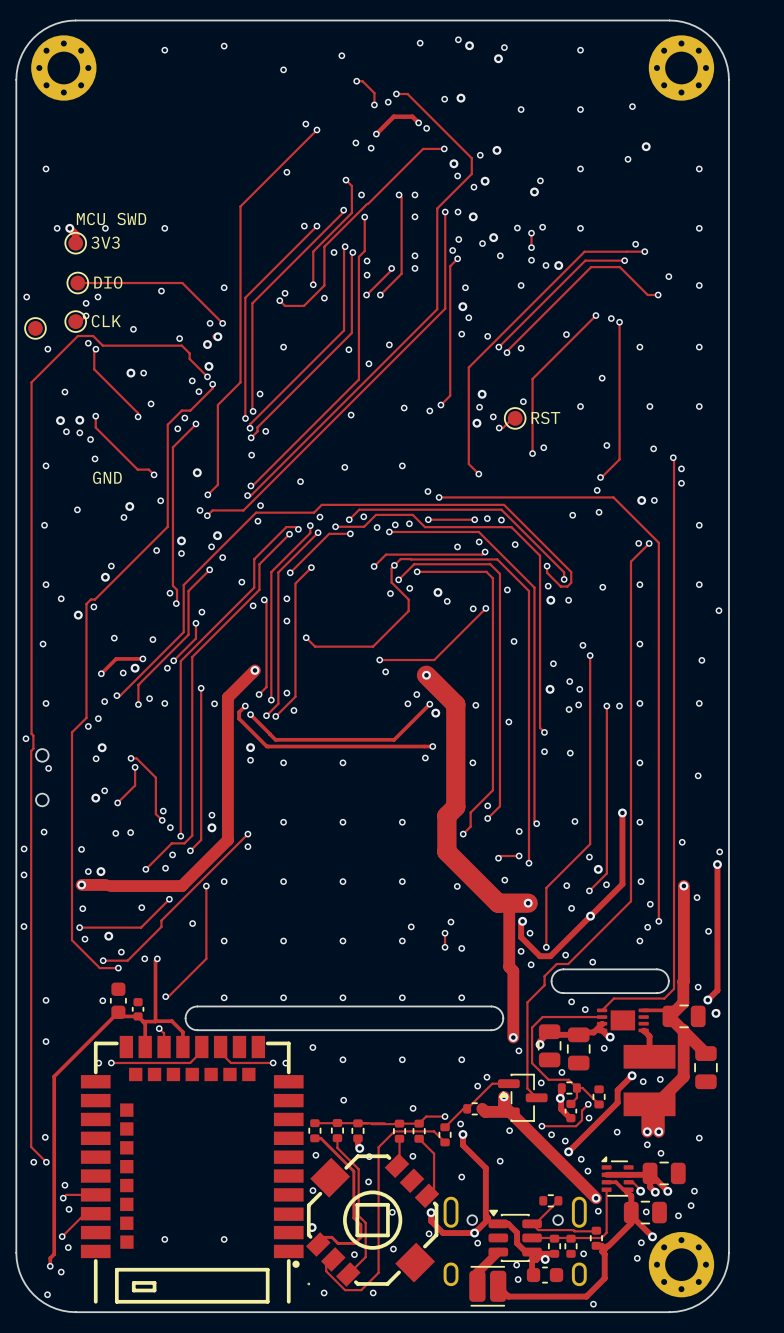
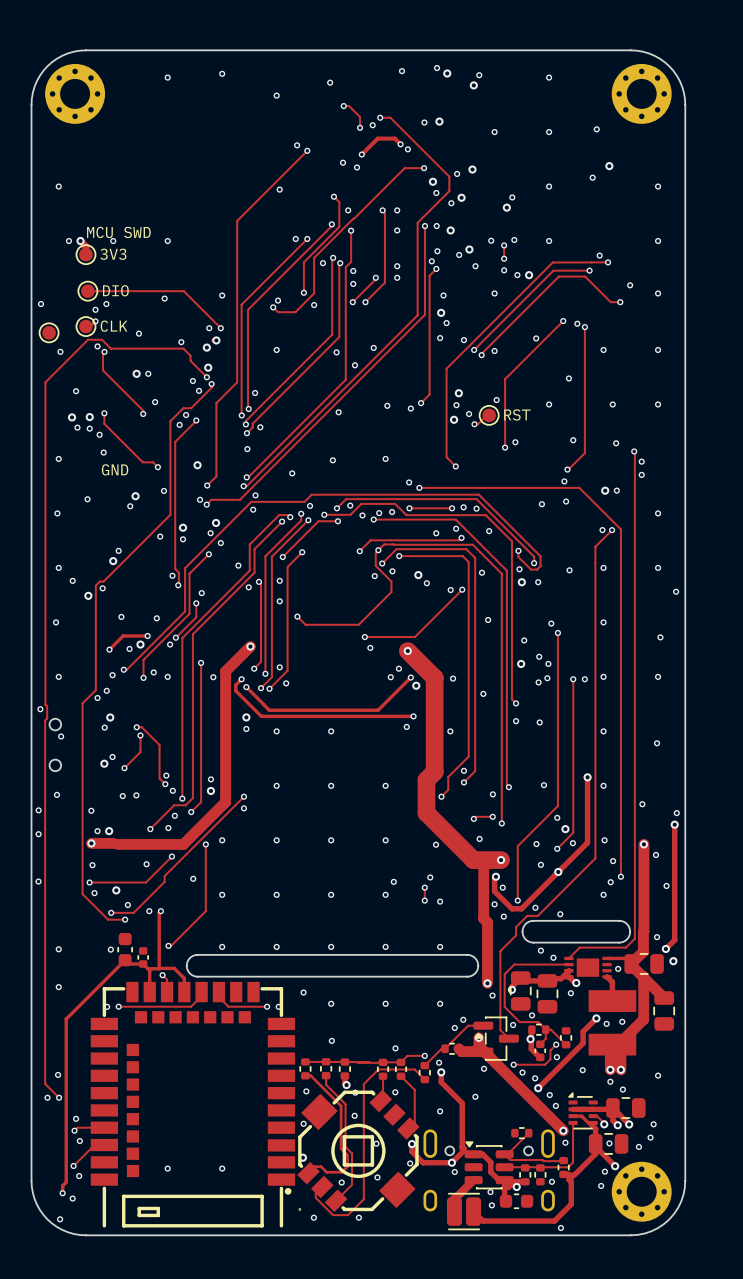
via: none -> (618, 968)

